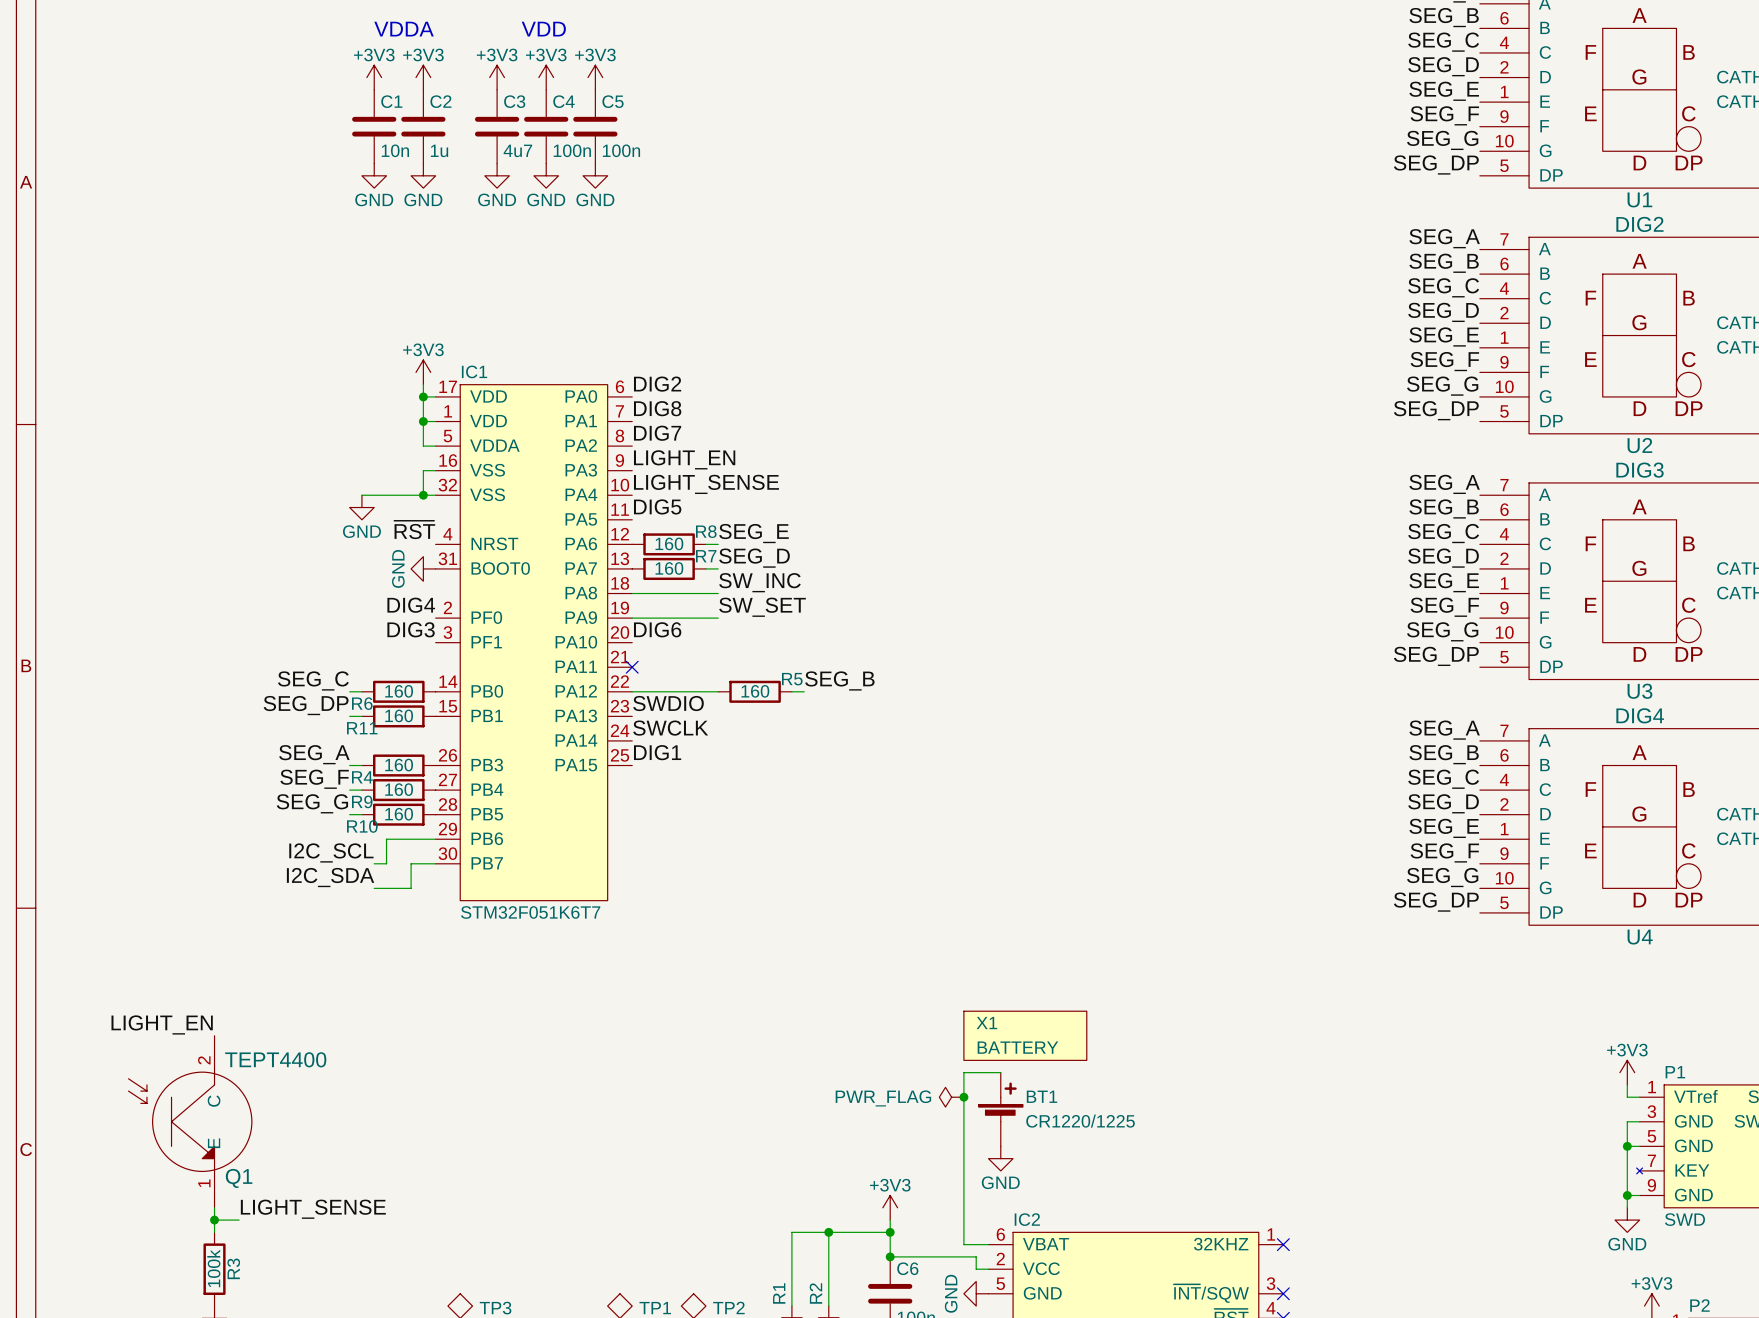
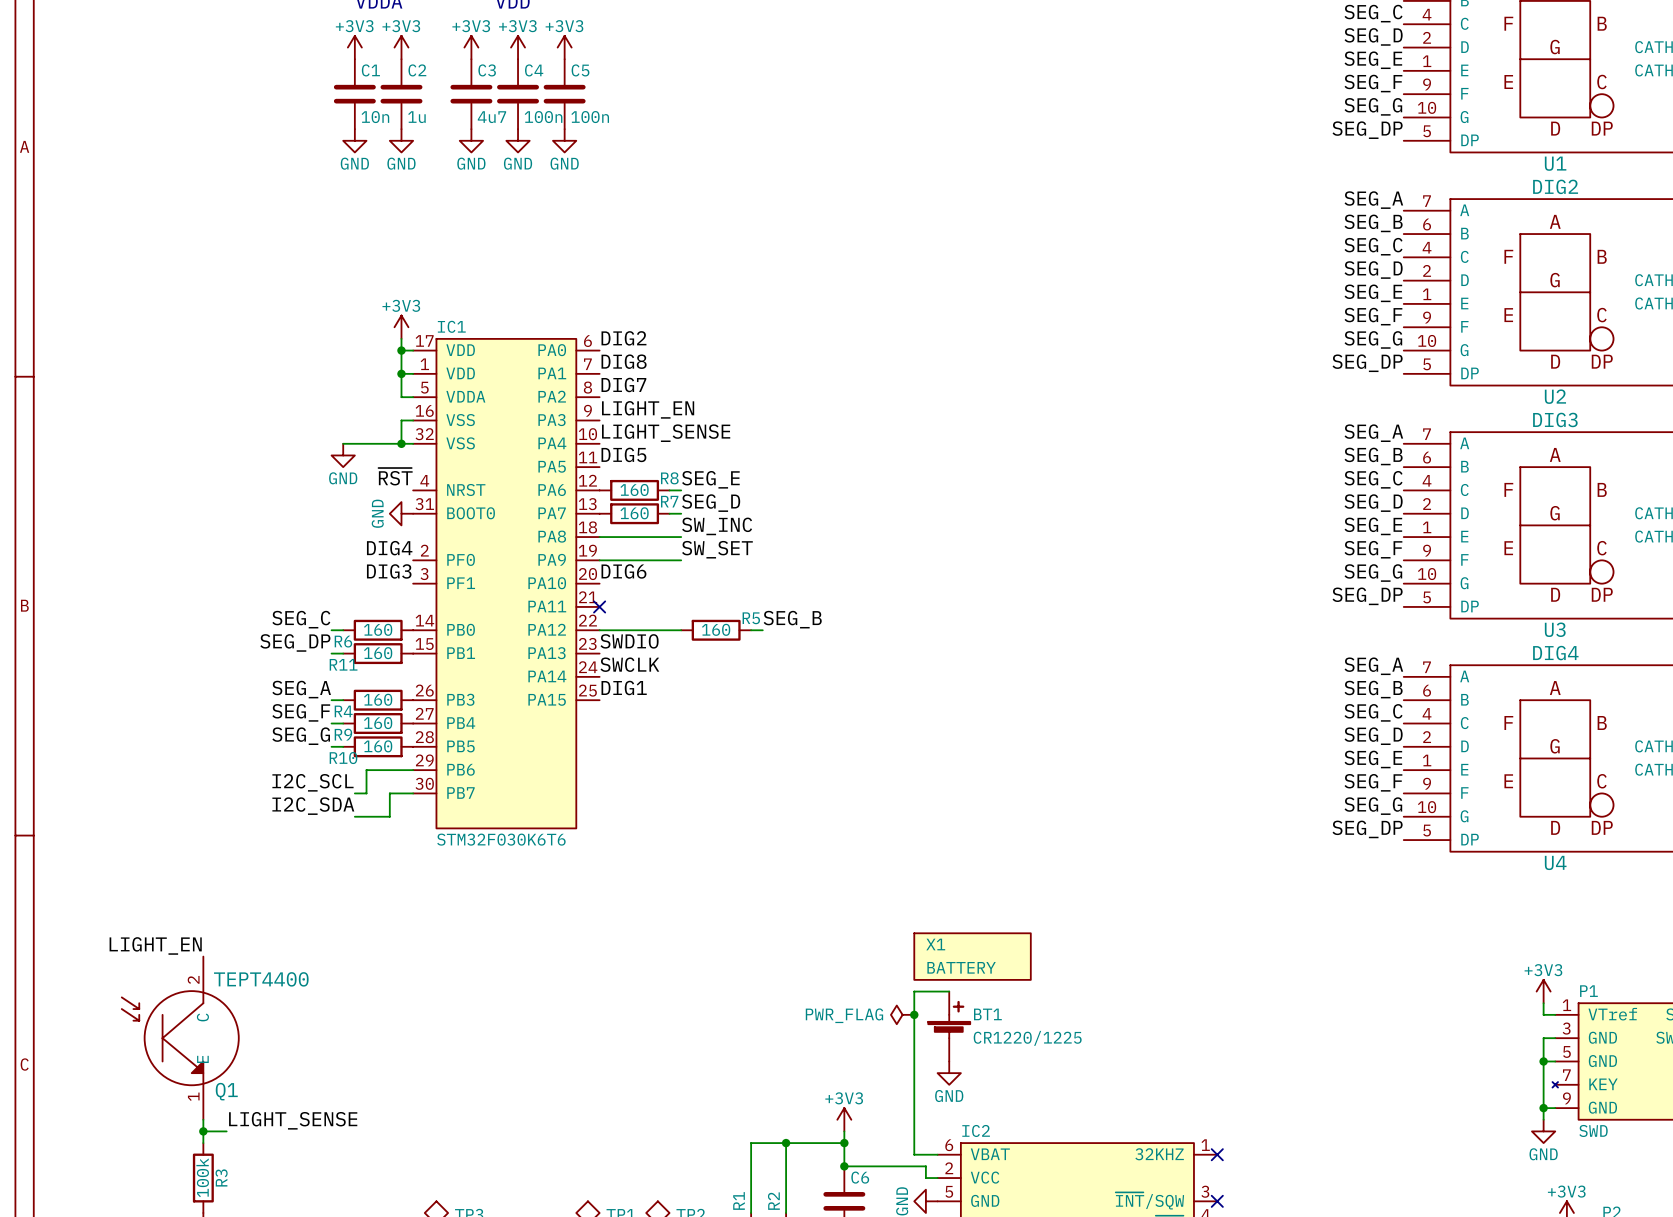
IC1 value: STM32F051K6T7 (530, 912) -> STM32F030K6T6 (501, 839)

